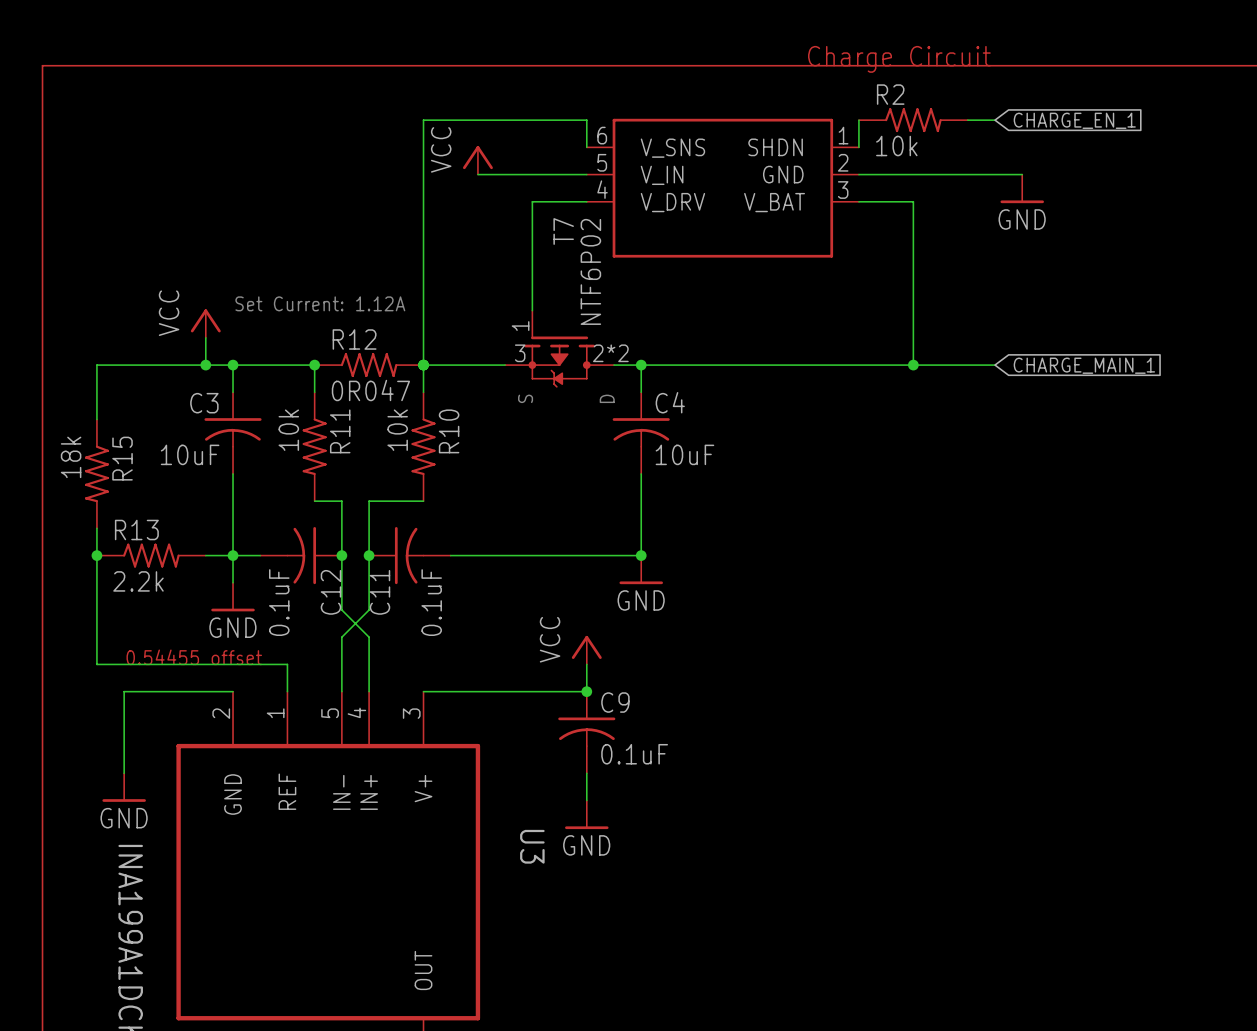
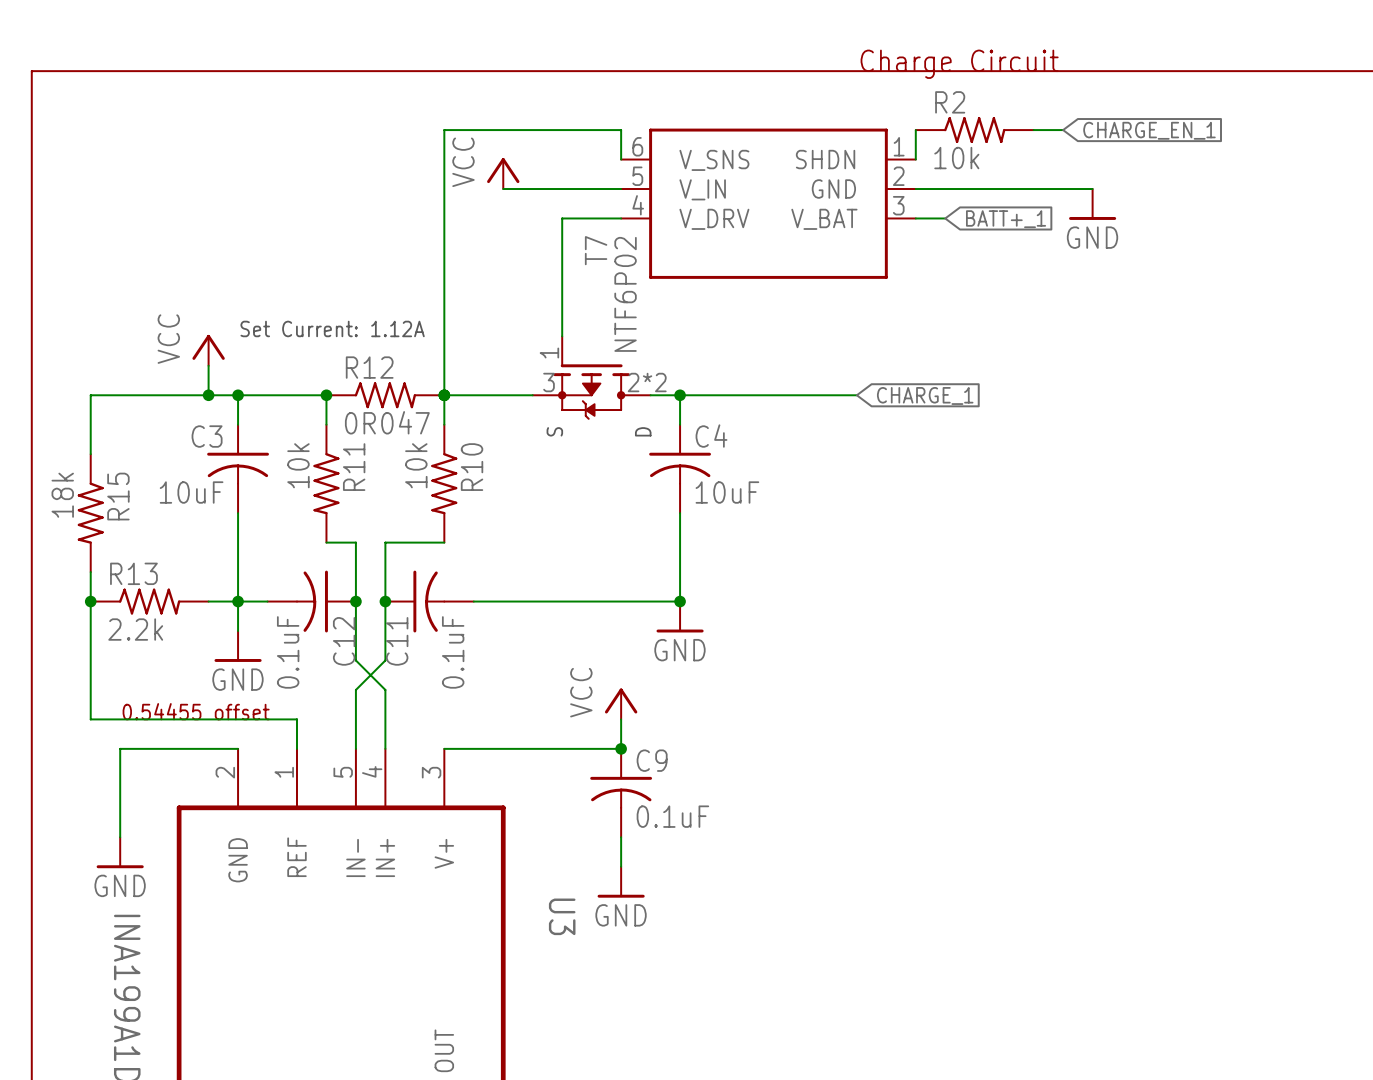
wire: (886, 201) (913, 201) (913, 365) -> none
global label: none -> BATT+_1 (1006, 219)
wire: (804, 365) (995, 365) -> none
global label: none -> CHARGE_1 (925, 395)
junction: (913, 365) -> none
global label: CHARGE_MAIN_1 (1084, 365) -> none

